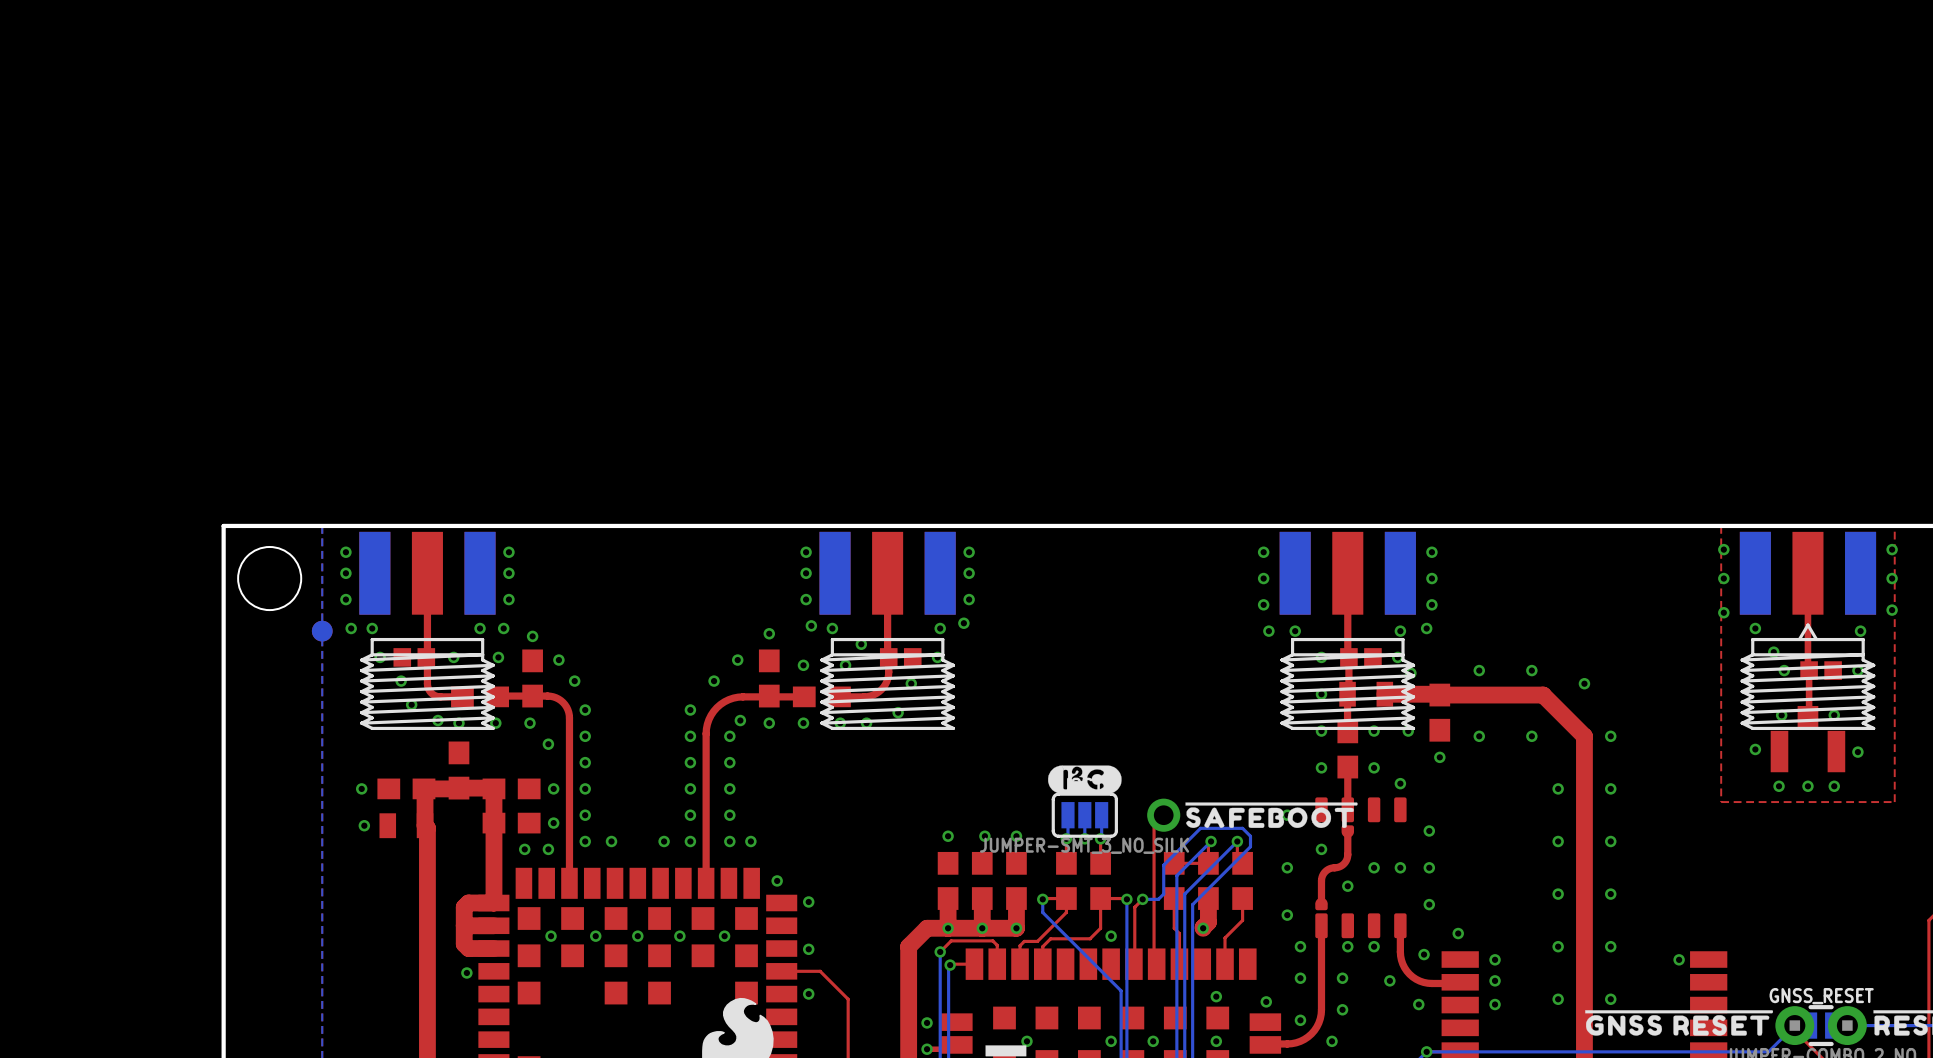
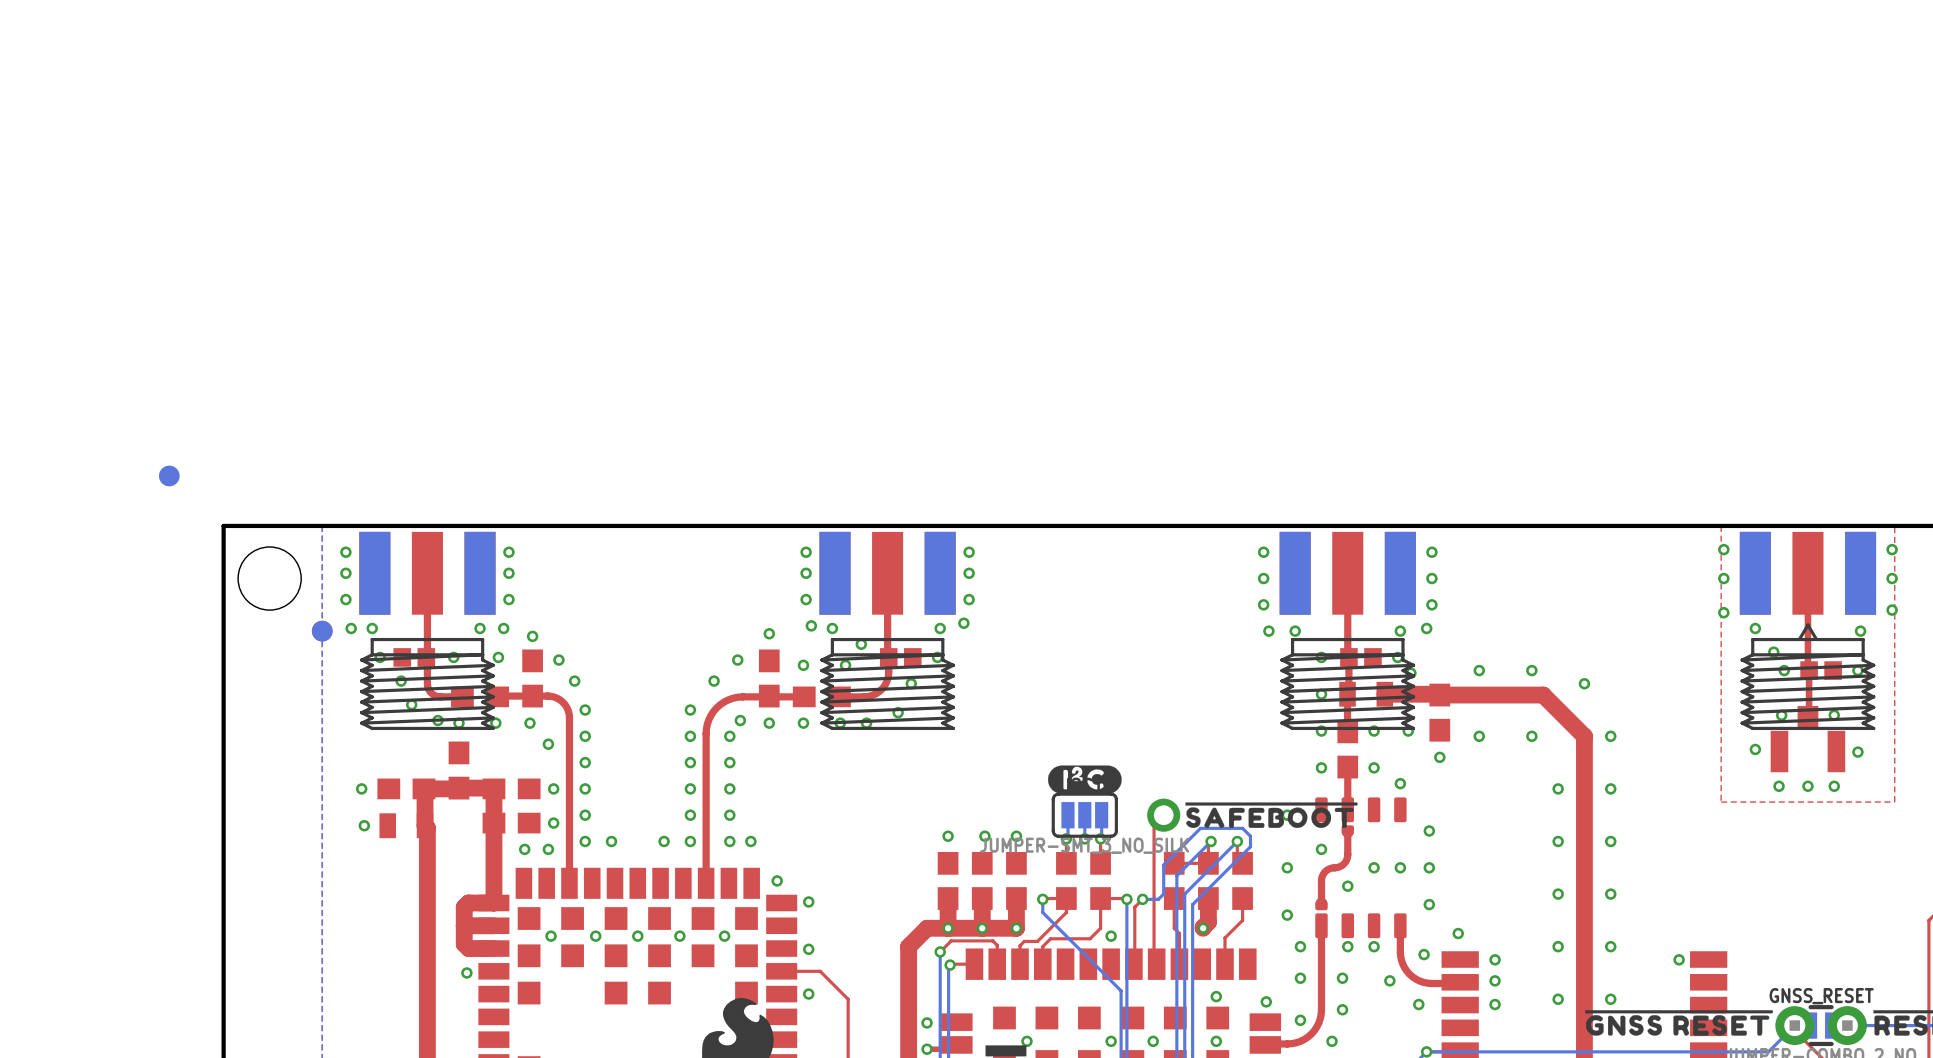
part: none -> (169, 475)

